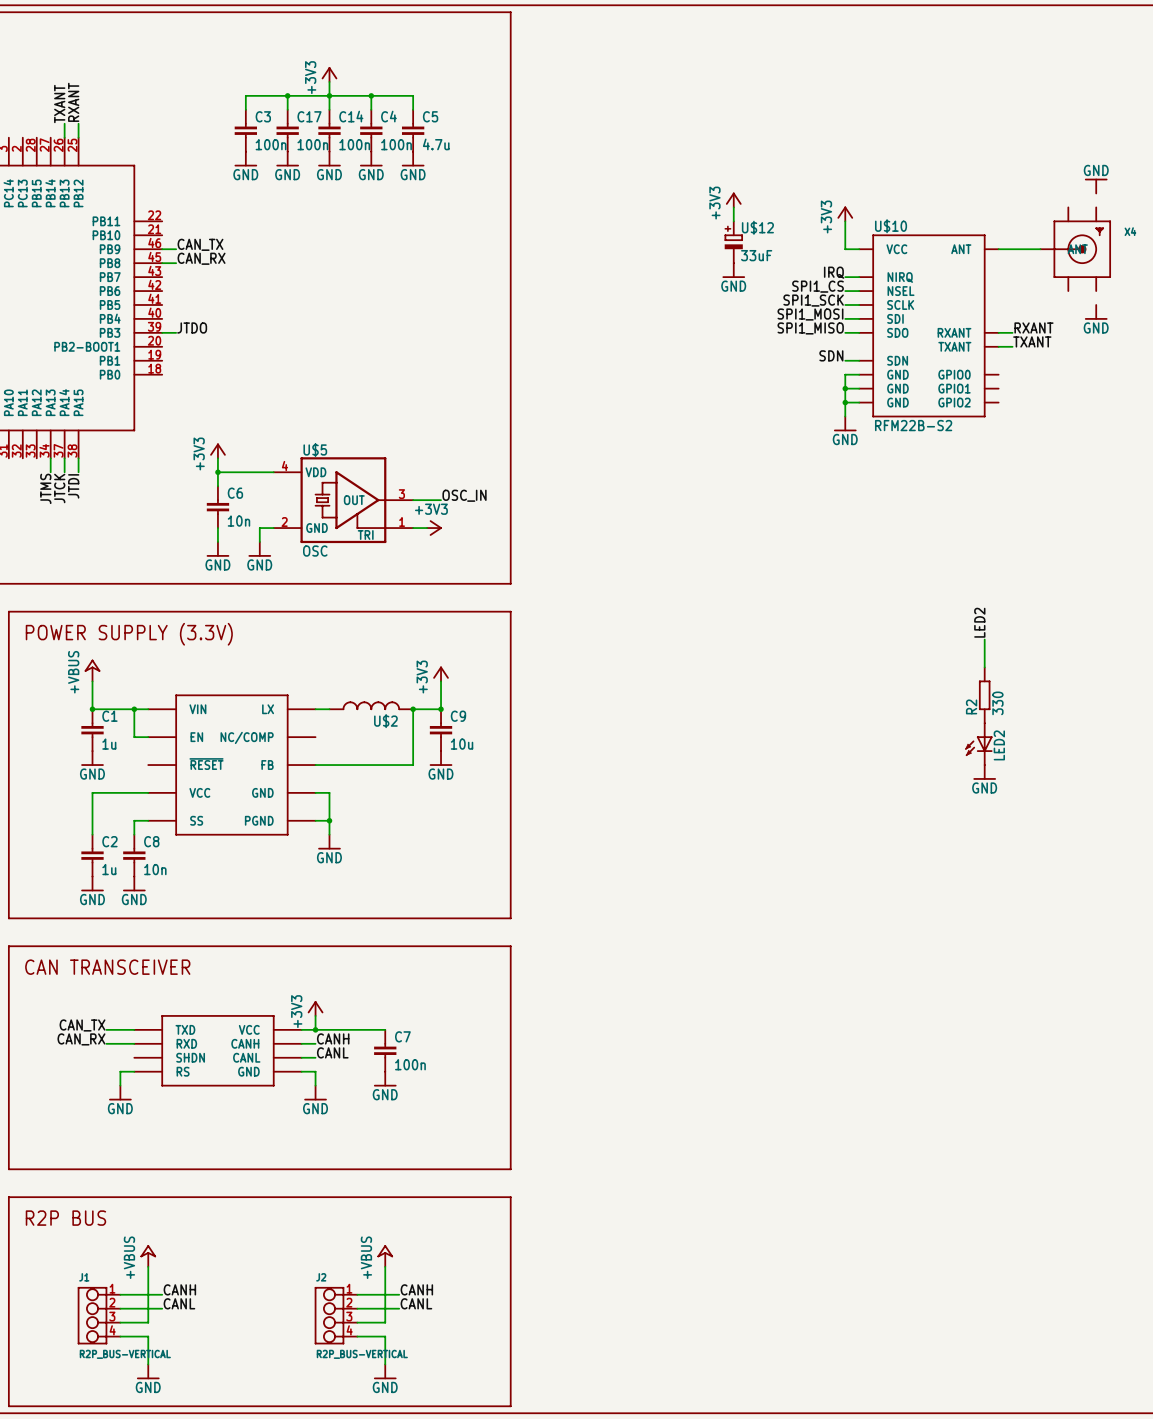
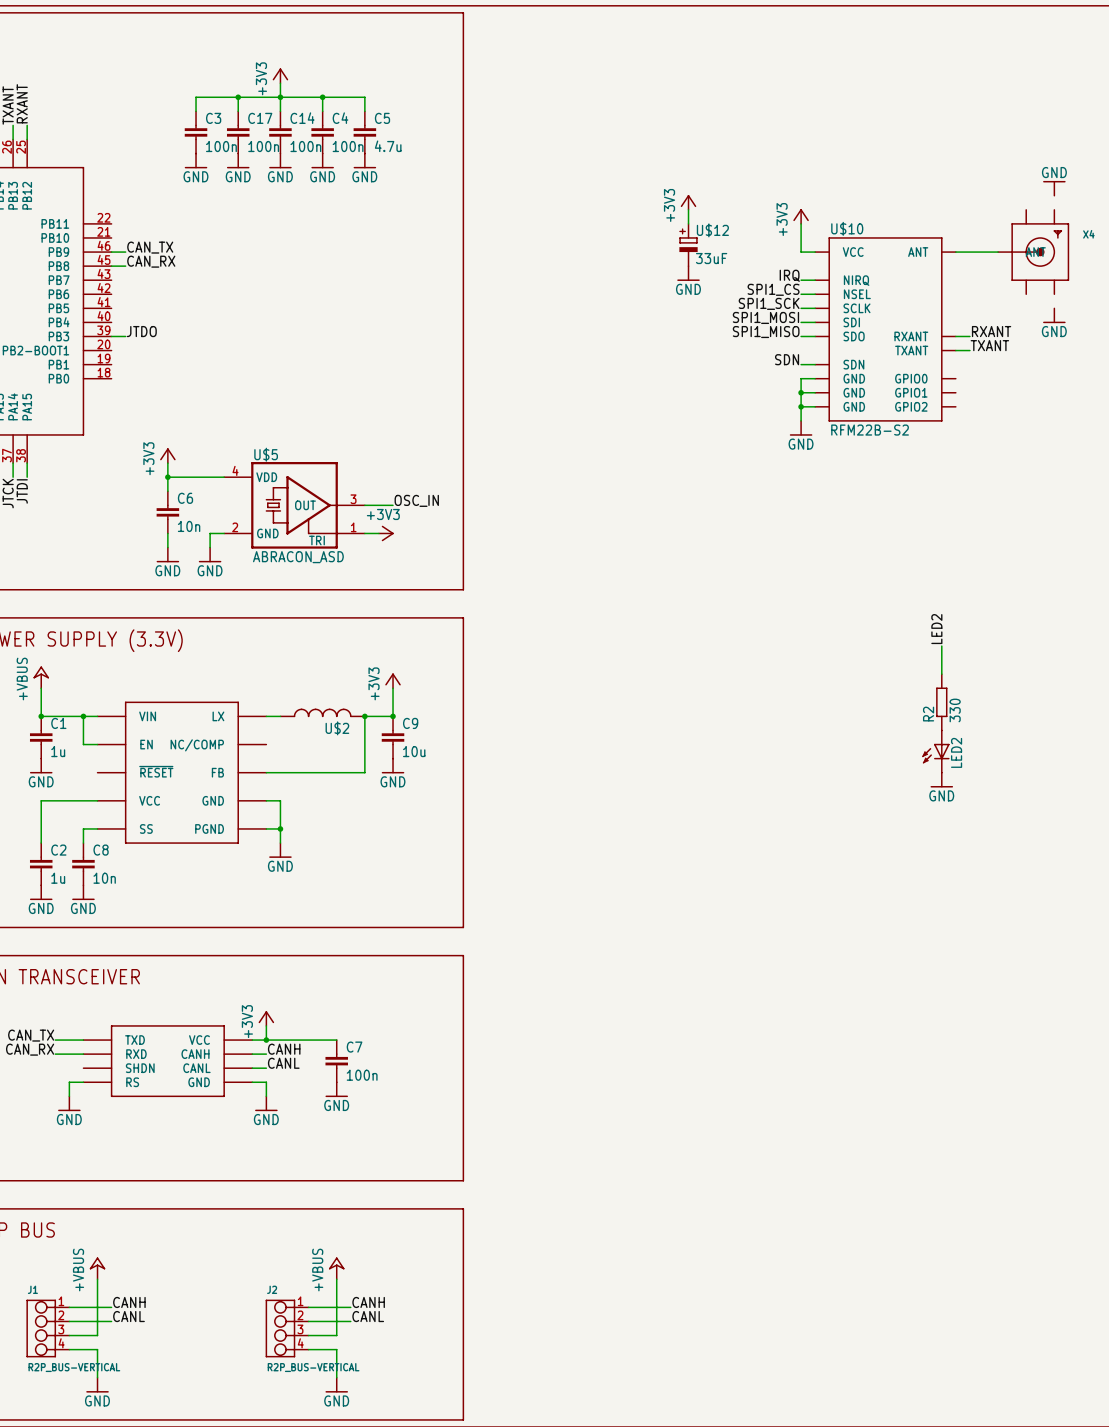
U$5 value: OSC (315, 551) -> ABRACON_ASD (298, 557)

